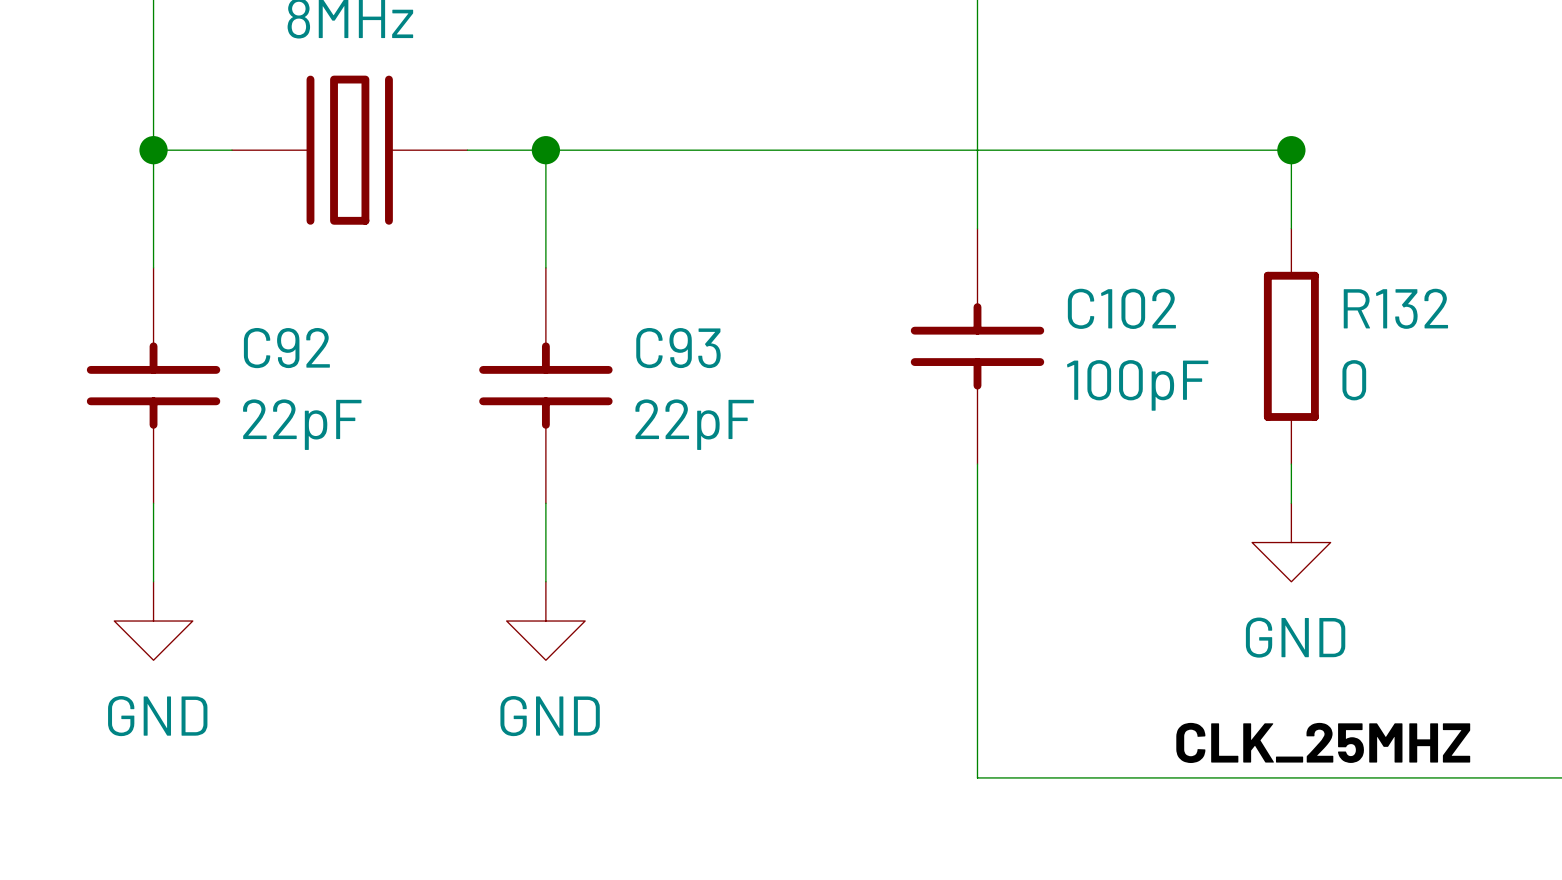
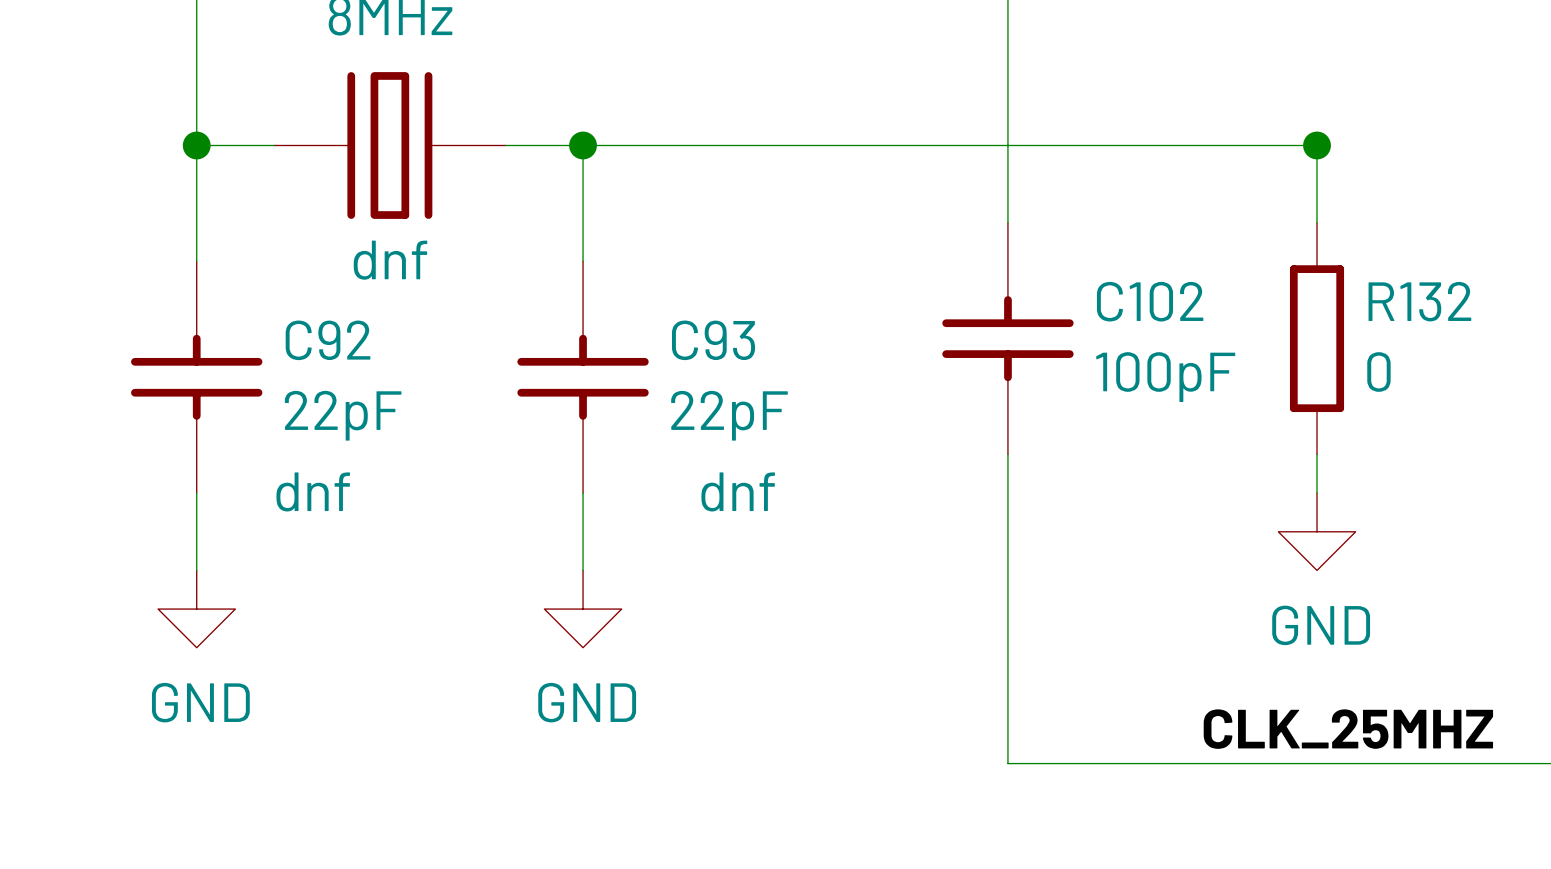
part text: none -> dnf (390, 260)
C92 text: none -> dnf (313, 491)
C93 text: none -> dnf (738, 491)

